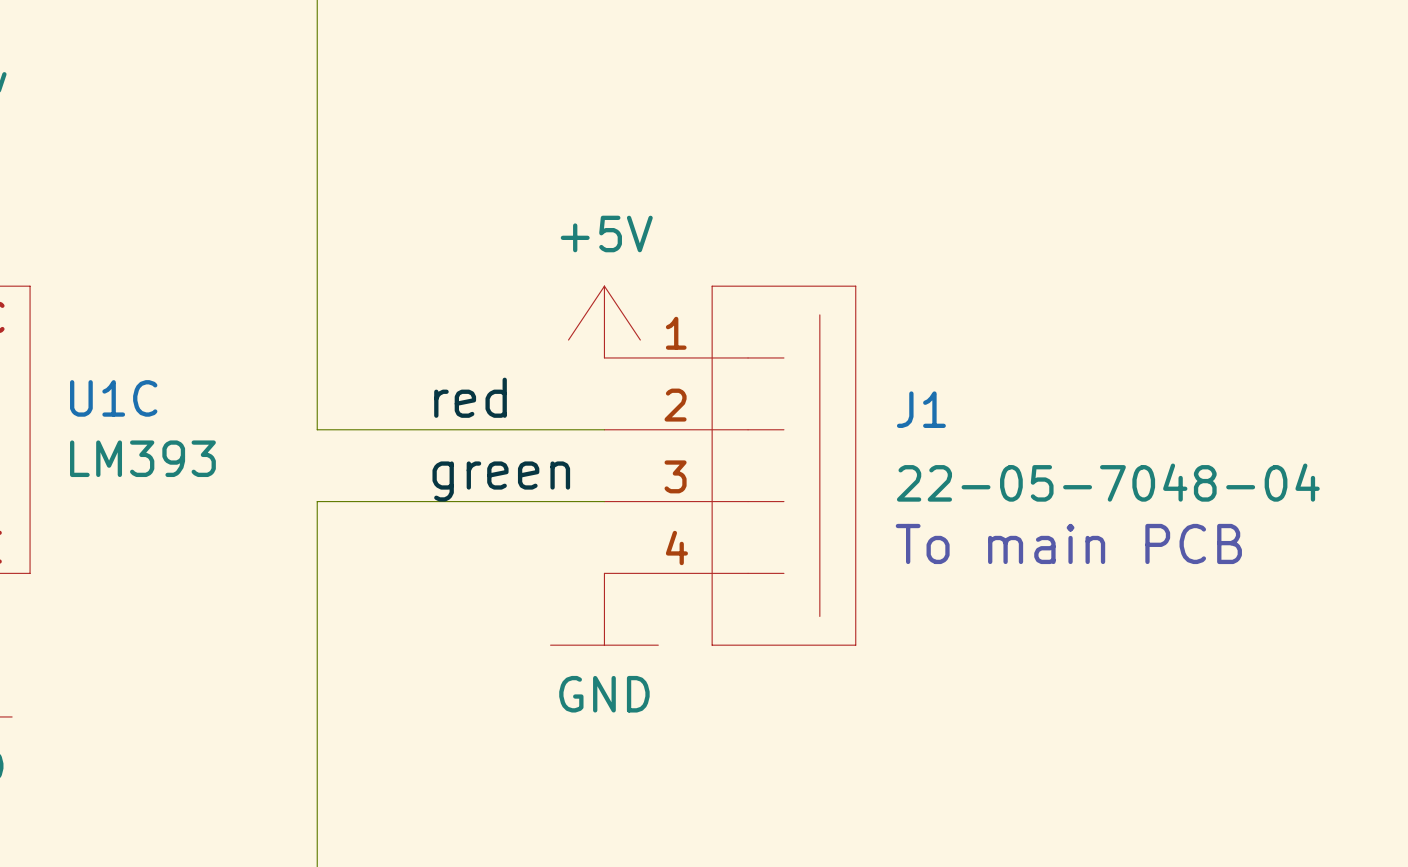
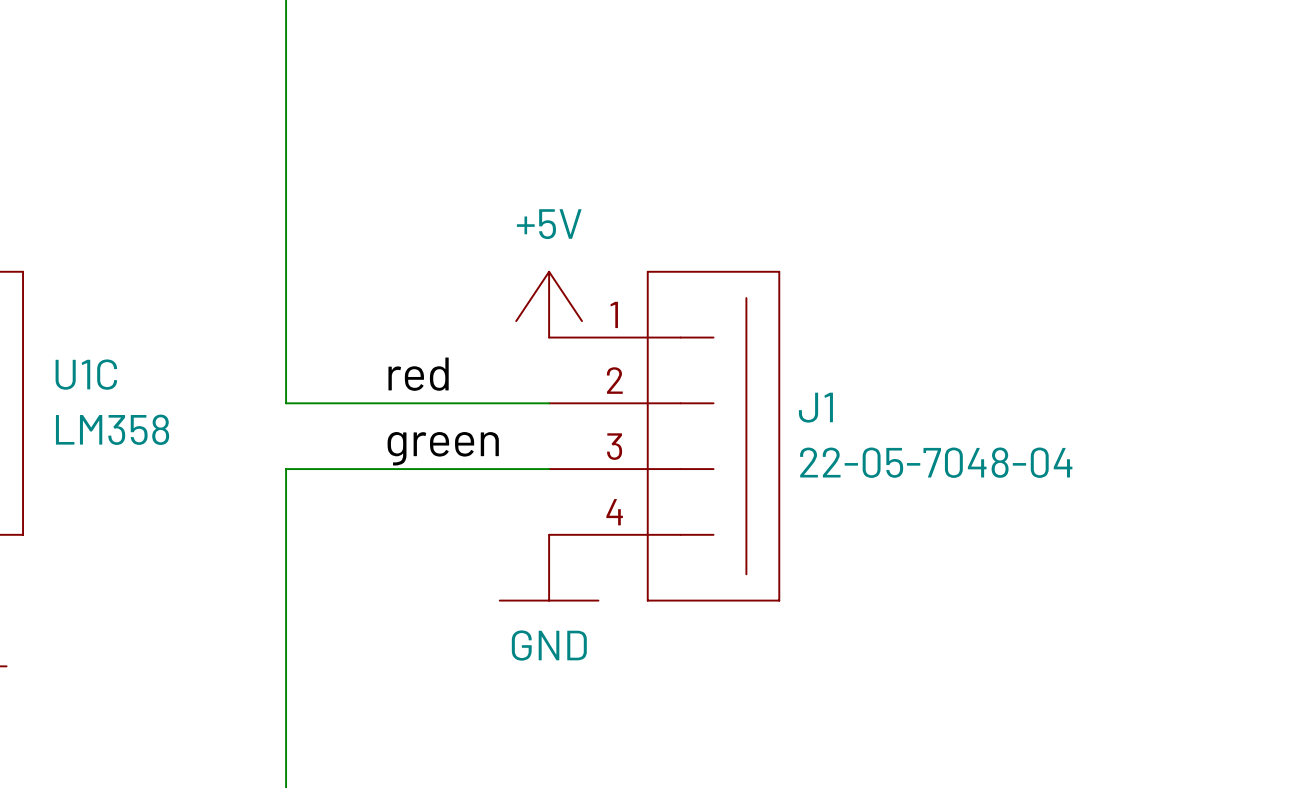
J1 name position: J1 (921, 409) -> J1 (815, 407)
U1C value: LM393 (142, 458) -> LM358 (112, 429)
J1 value position: 22-05-7048-04 (1108, 482) -> 22-05-7048-04 (936, 462)
text: To main PCB (1068, 543) -> none

